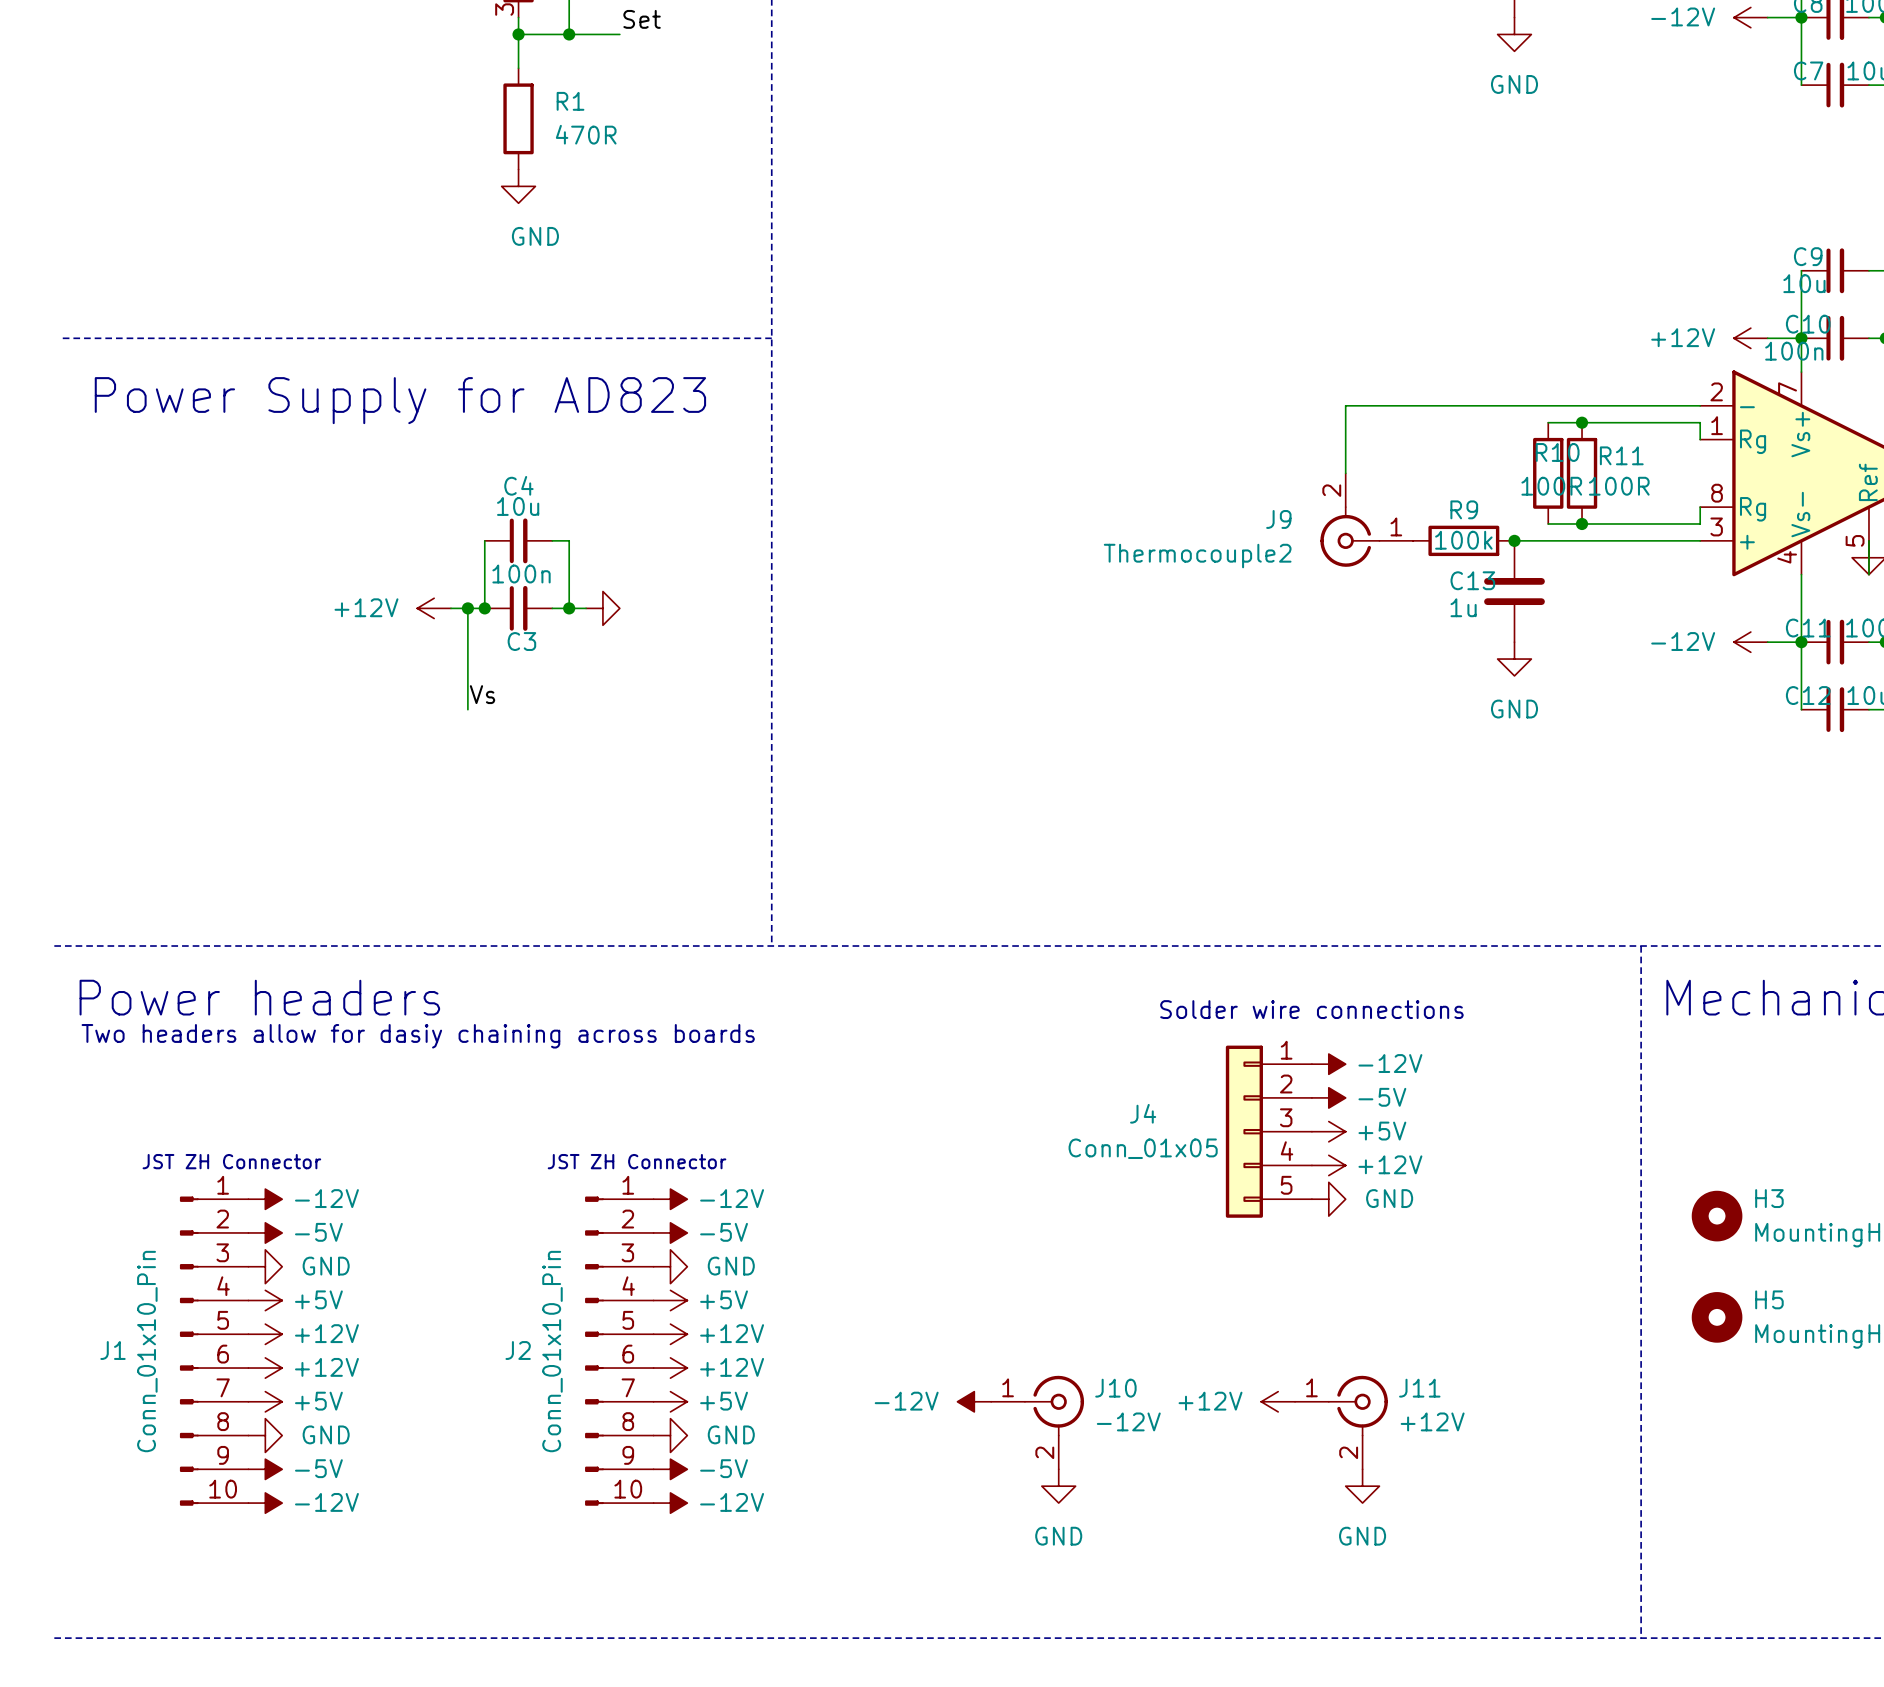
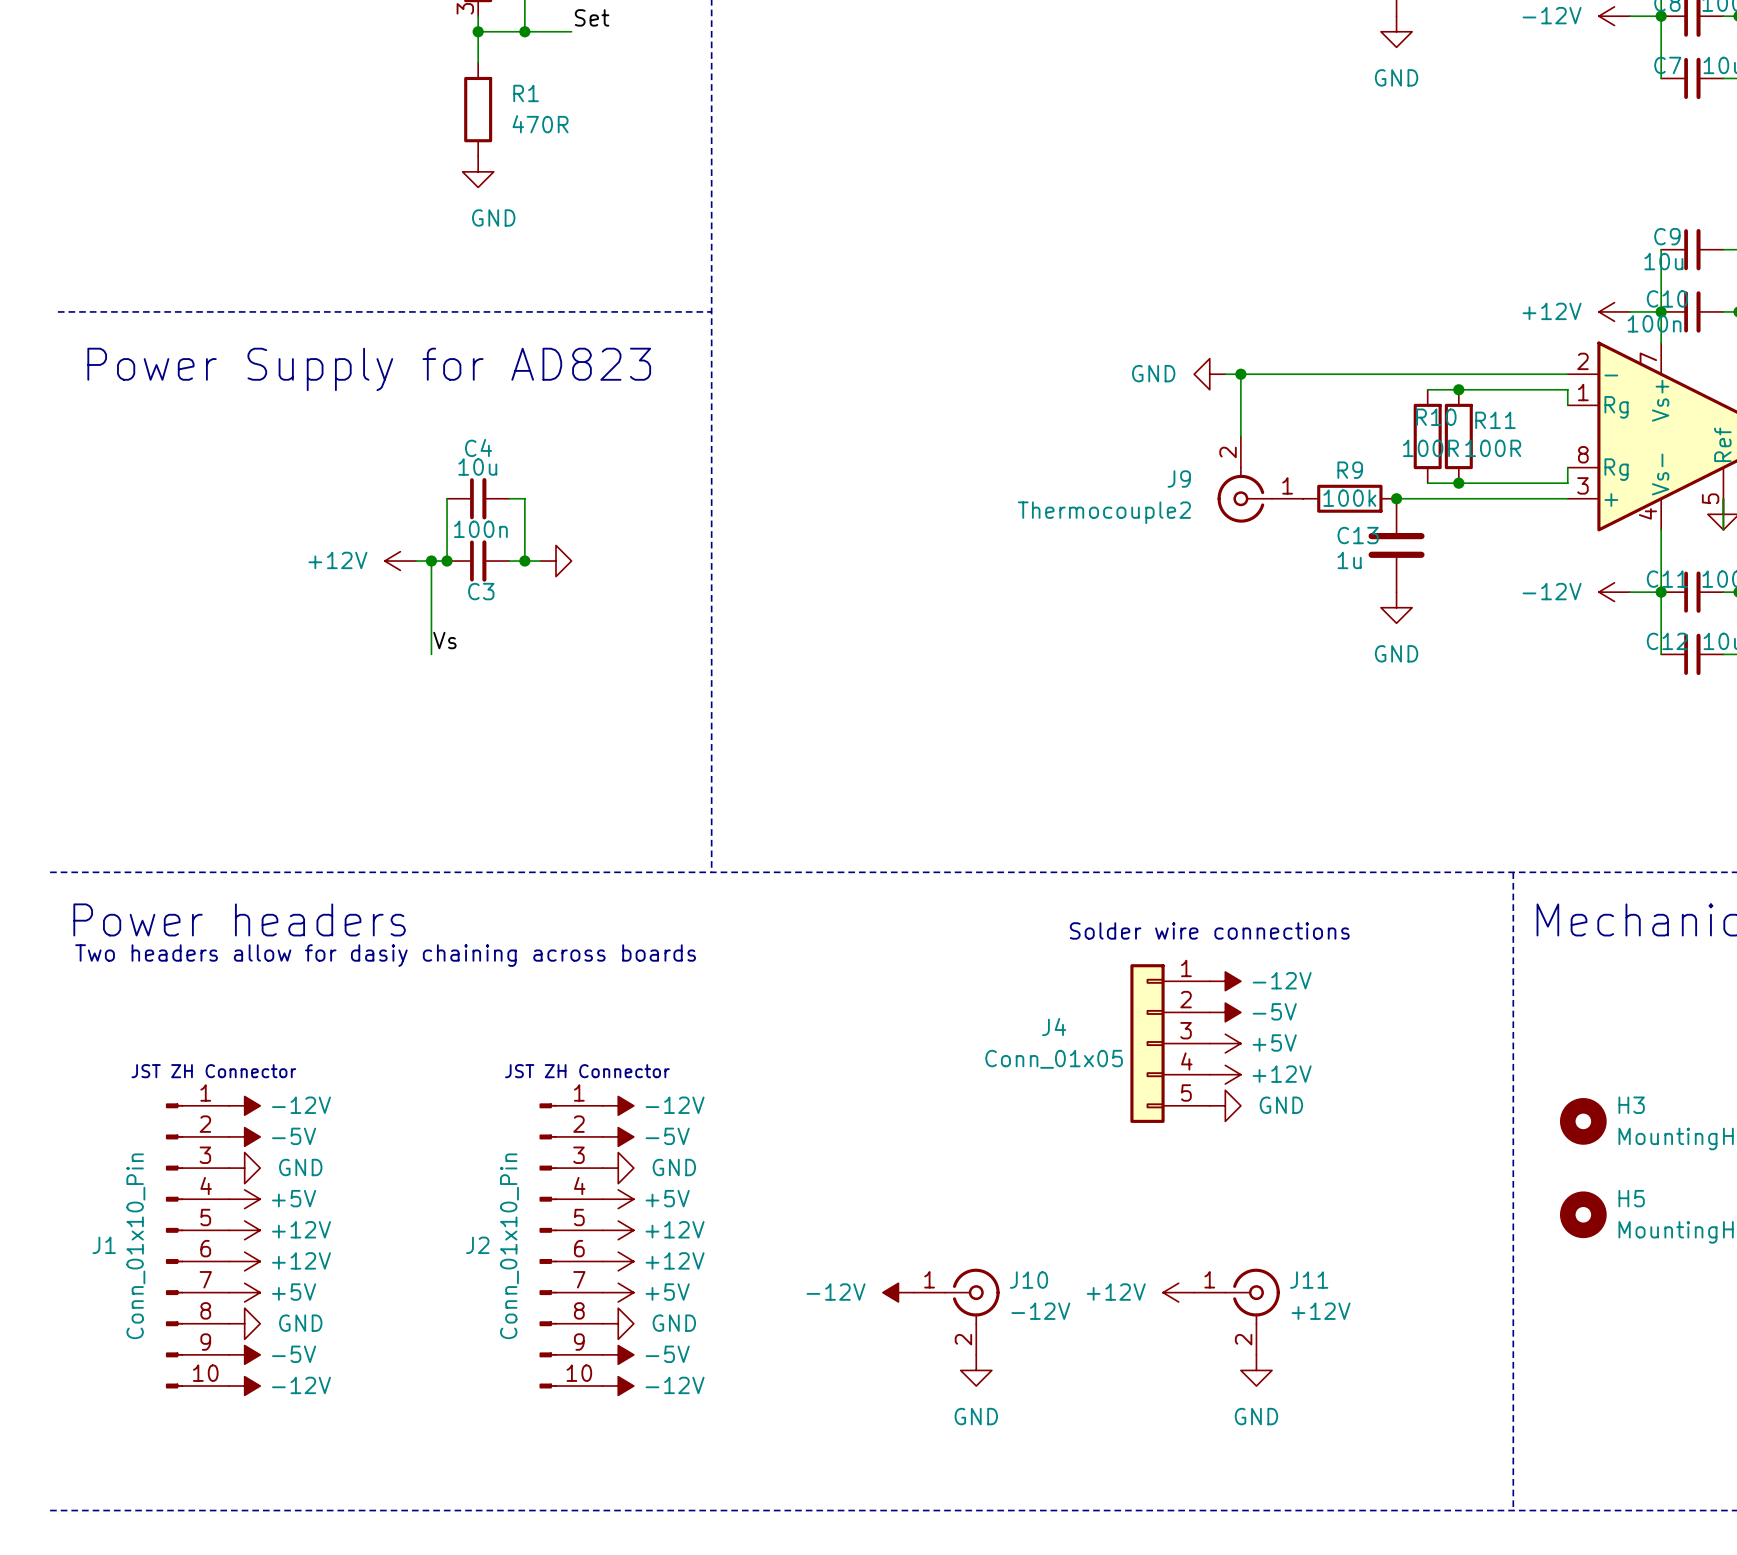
power symbol: none -> GND (1209, 374)
wire: none -> (1225, 374) (1240, 374)
junction: none -> (1240, 374)

